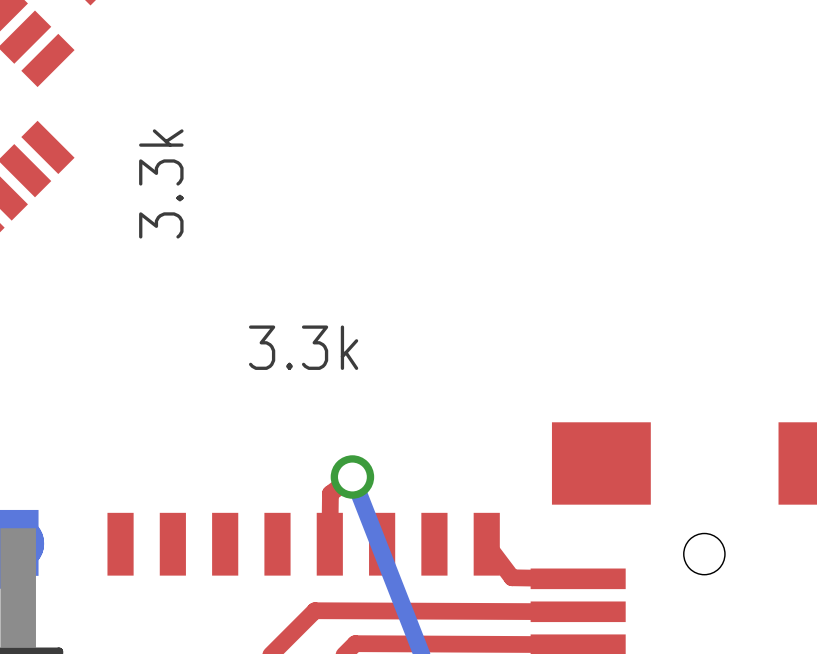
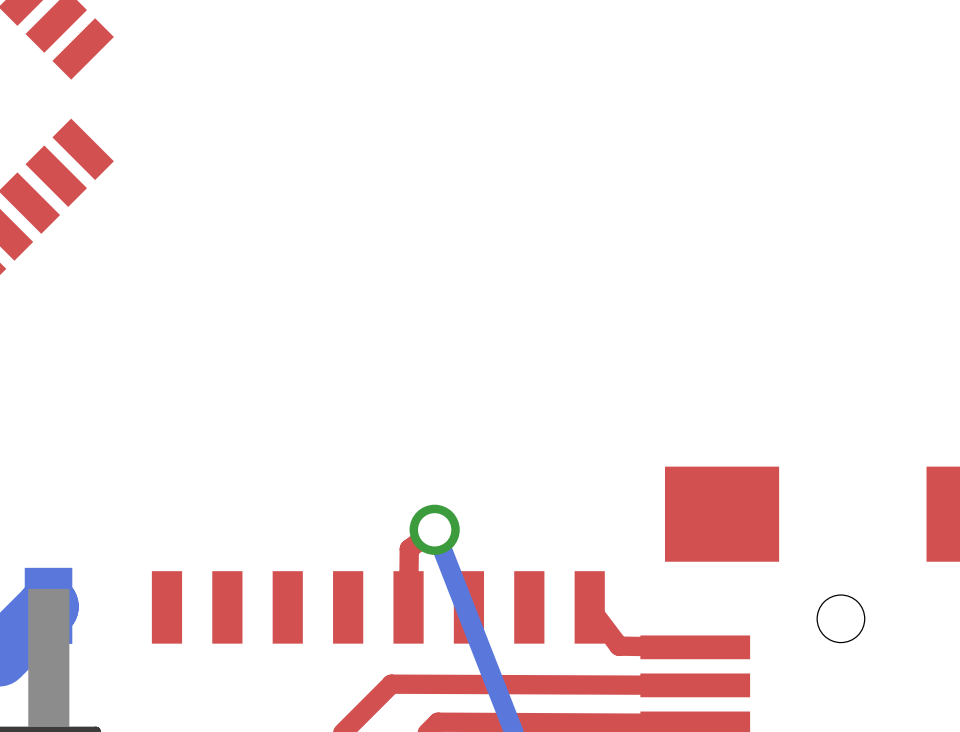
text: 3.3k (161, 183) -> none
text: 3.3k (303, 347) -> none

